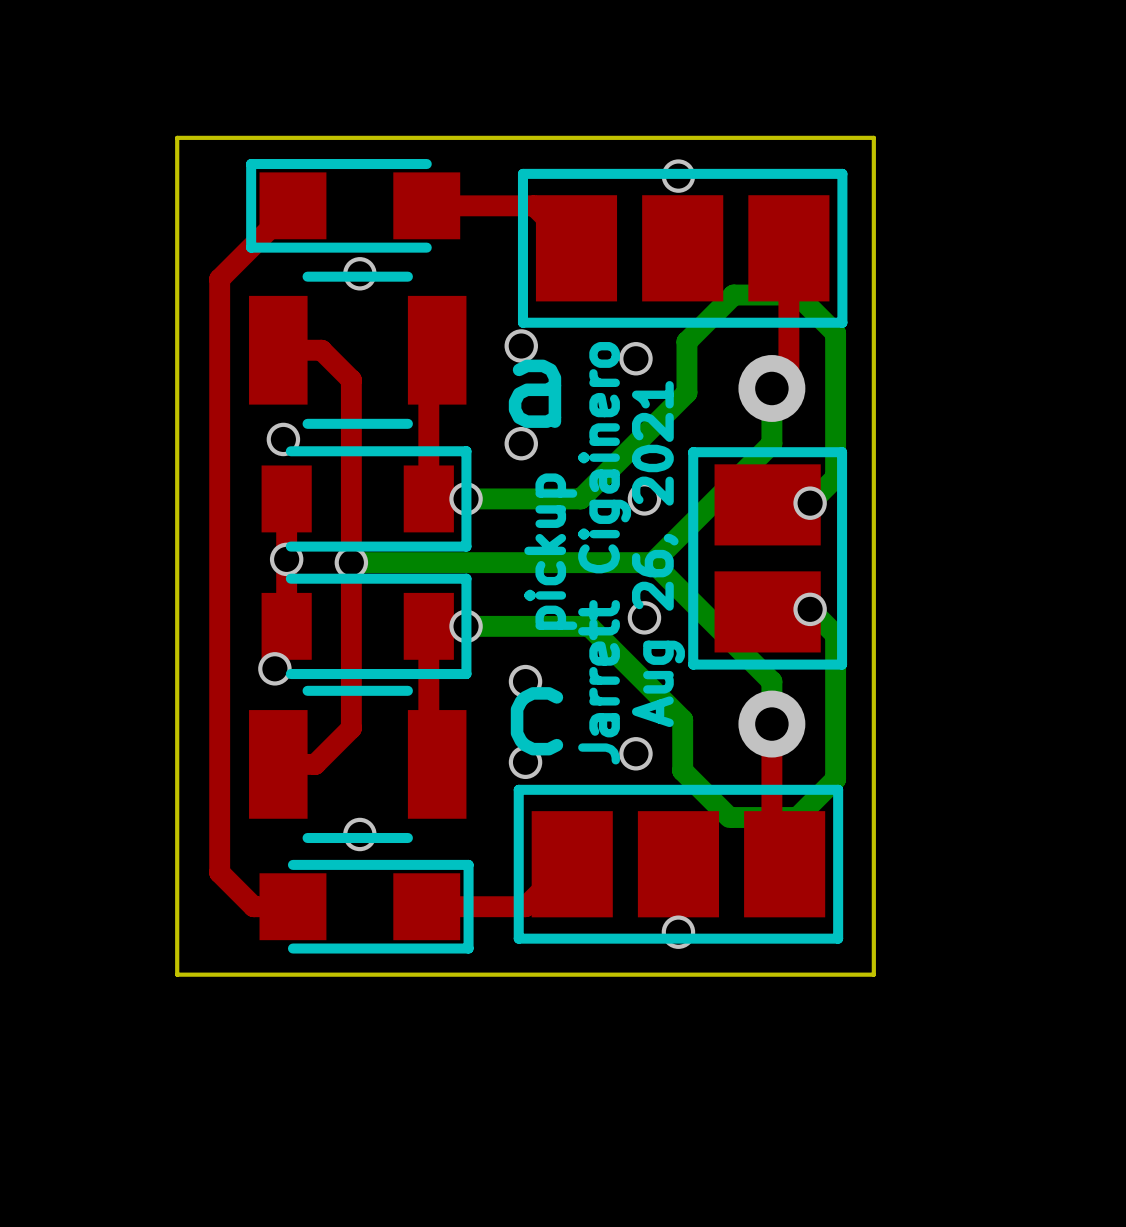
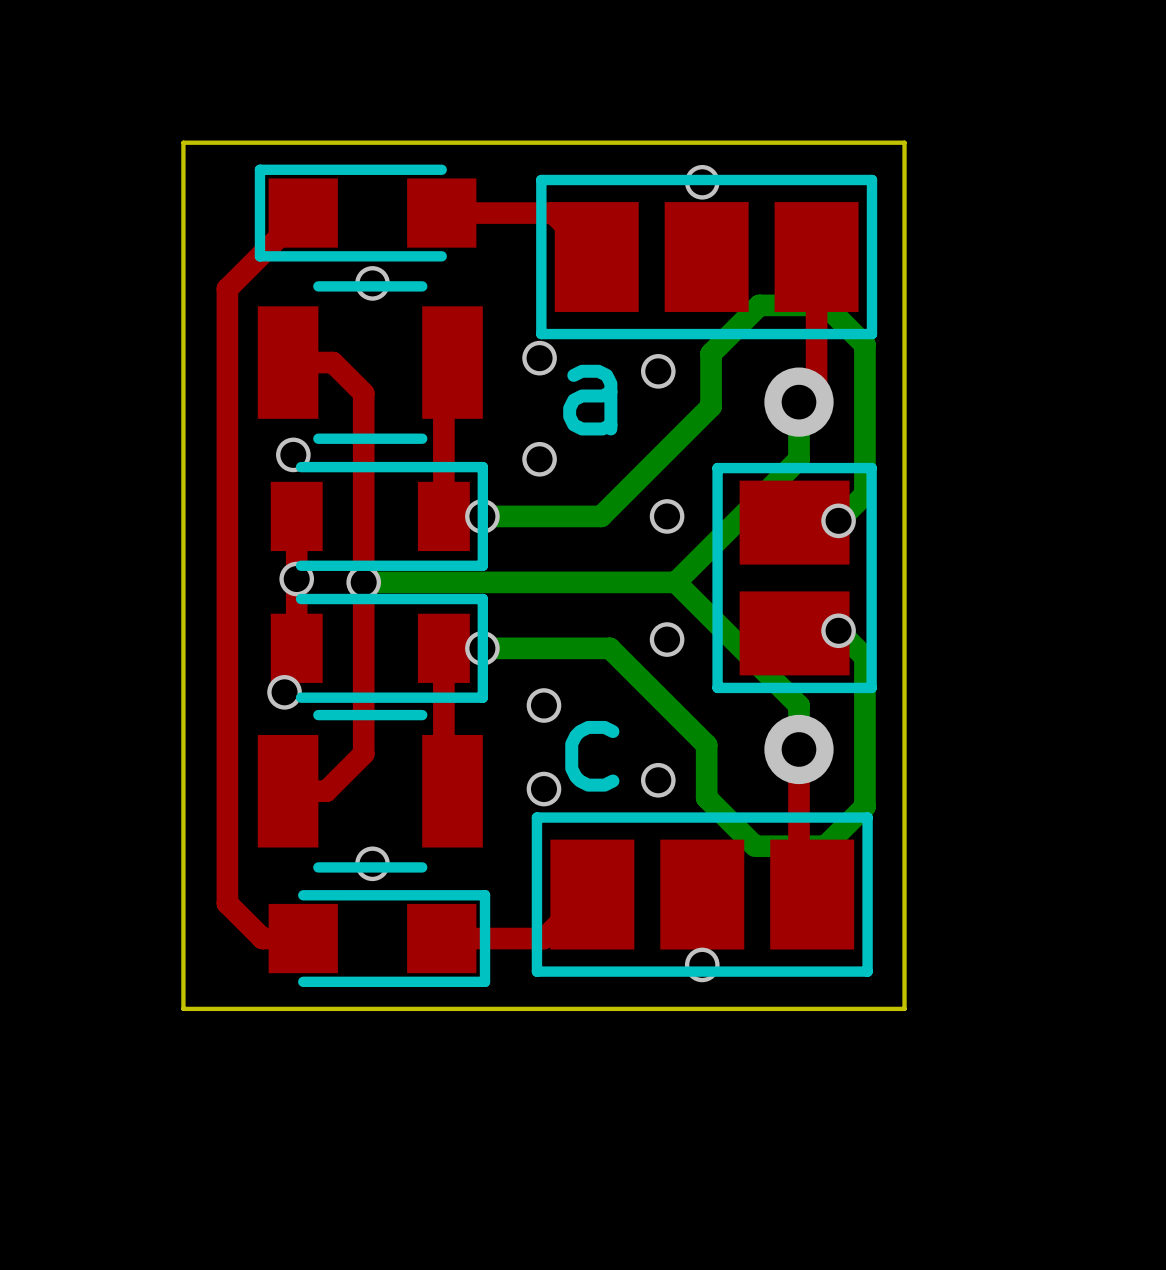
text position: a (535, 393) -> a (590, 400)
text: pickup (550, 551) -> none
text: Jarrett Cigainero (604, 553) -> none
text: Aug 26, 2021 (658, 554) -> none
text position: c (536, 721) -> c (592, 756)

